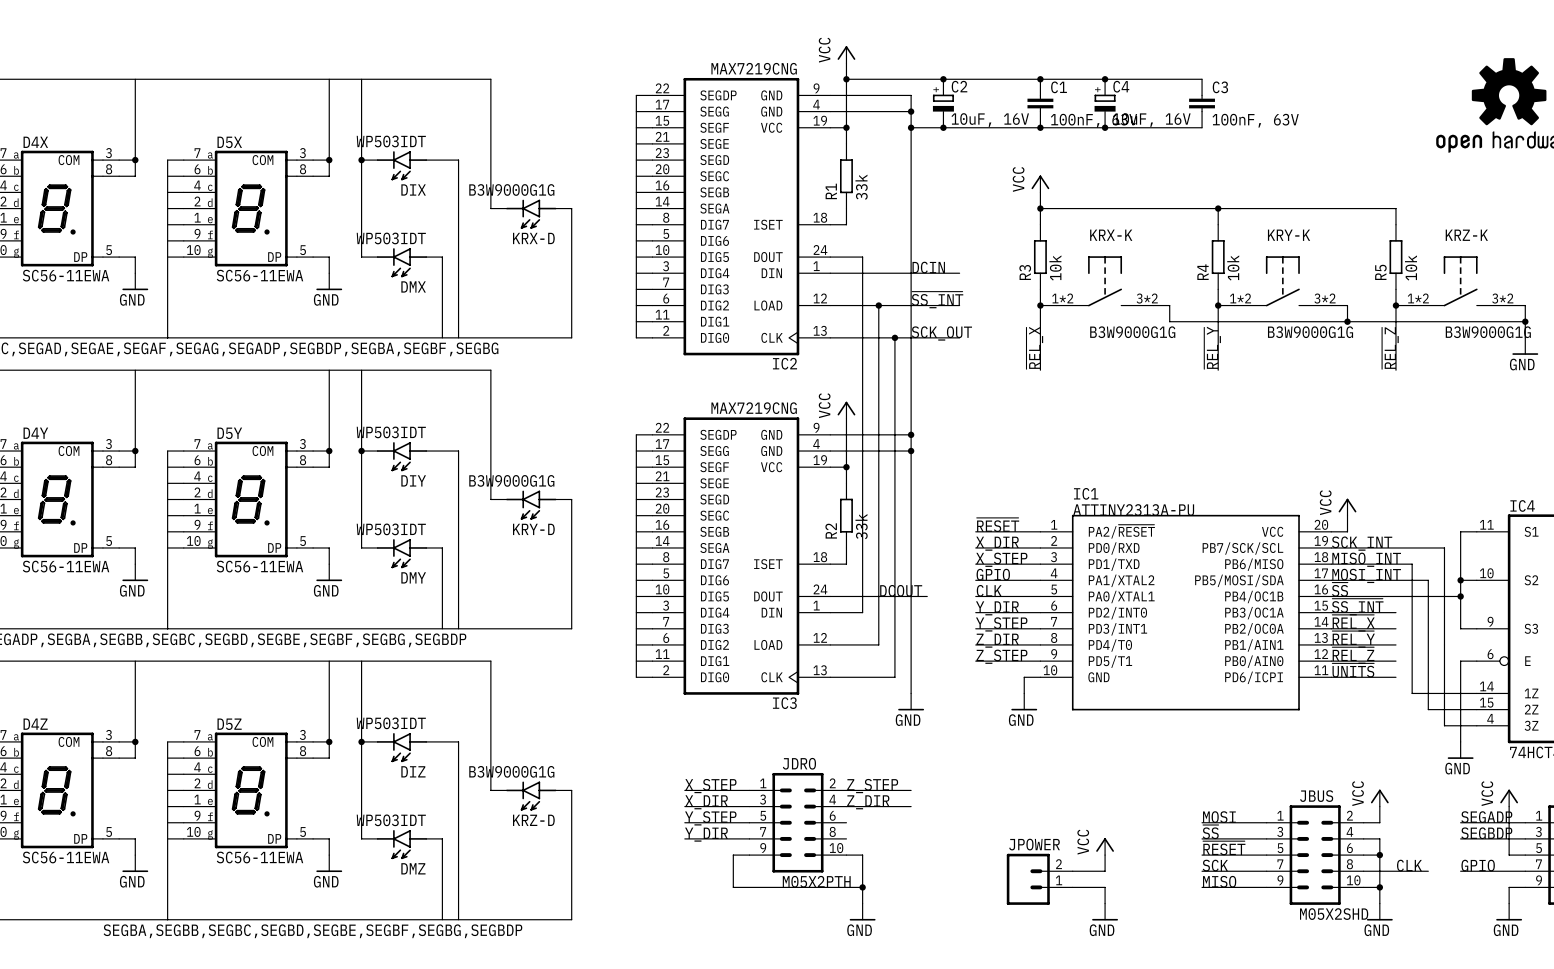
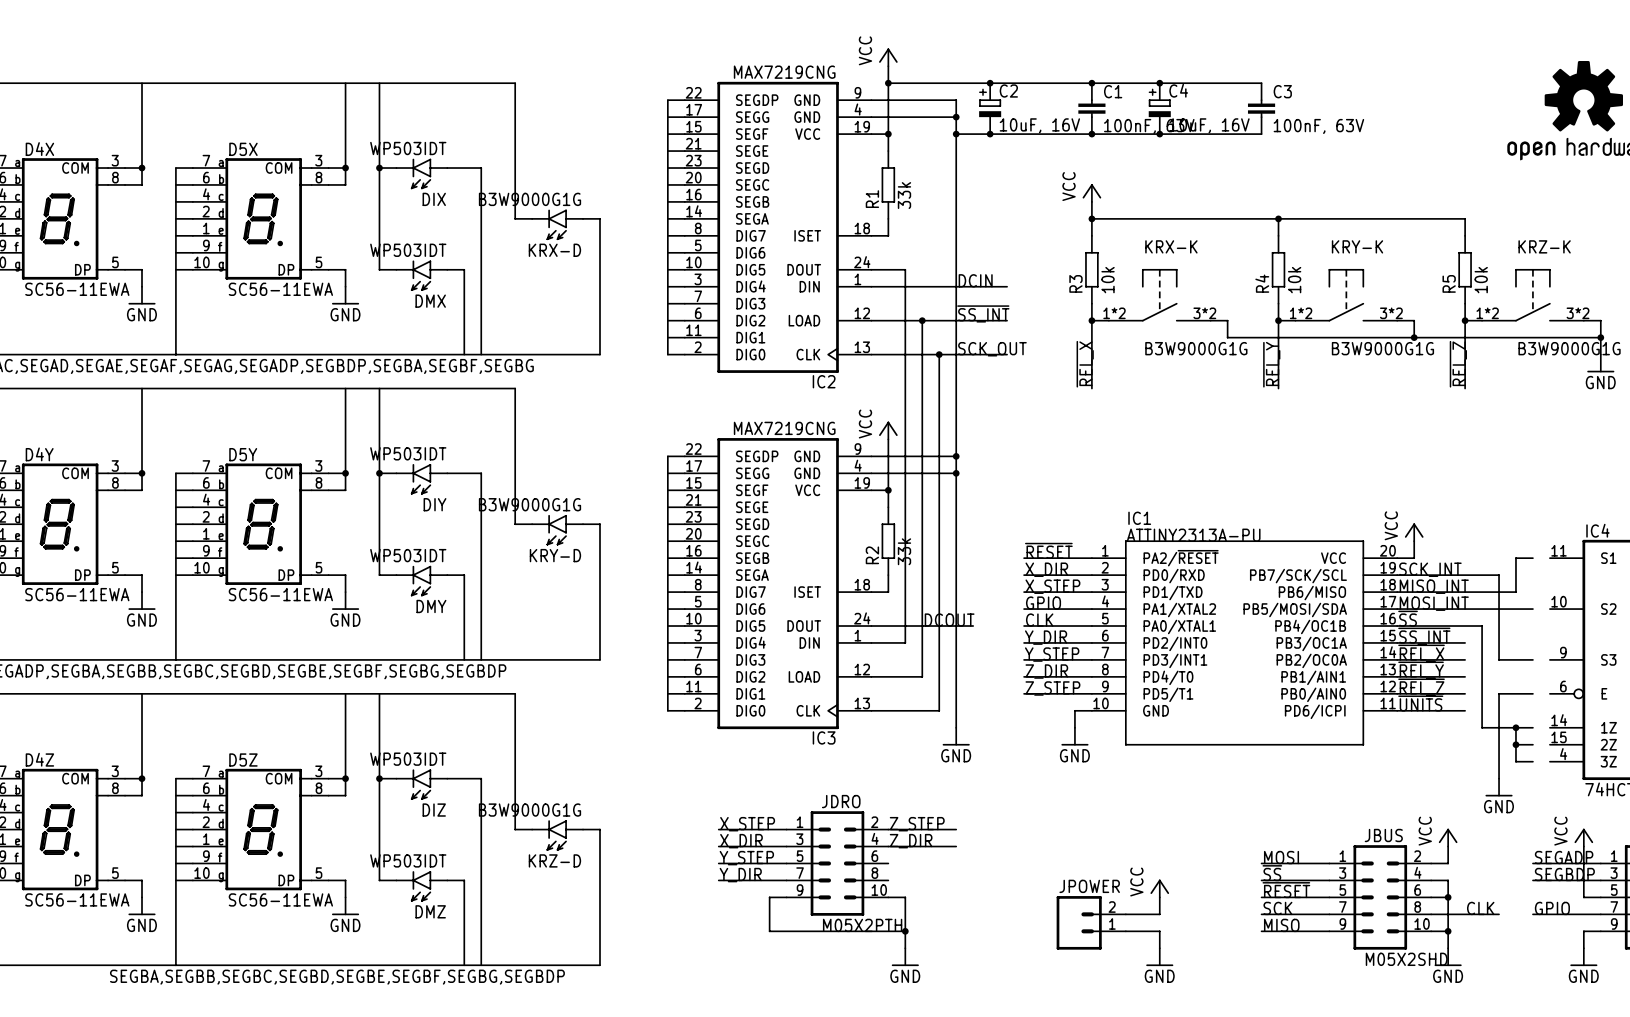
wire: (1476, 531) (1460, 531) (1460, 628) (1476, 628) -> none
wire: (1428, 547) (1444, 547) -> (1532, 558) (1515, 558) (1515, 575)
wire: (1412, 564) (1412, 596) (1460, 596) -> (1482, 592) (1515, 592)
wire: (1444, 564) (1444, 693) -> none
wire: (1460, 580) (1476, 580) -> (1532, 609) (1499, 609) (1499, 575)
junction: (1460, 580) -> none
junction: (1460, 596) -> none
wire: (1428, 628) (1428, 661) -> (1499, 659) (1532, 659)
wire: none -> (1499, 693) (1532, 693)
wire: (1476, 661) (1460, 661) (1460, 741) -> none
junction: none -> (1515, 727)
wire: (1460, 693) (1476, 693) -> none
wire: (1428, 709) (1444, 709) -> (1499, 744) (1499, 778)
junction: none -> (1515, 744)
wire: (1460, 709) (1476, 709) -> none
wire: (1460, 725) (1476, 725) -> none
power symbol position: GND (1460, 750) -> GND (1499, 787)

